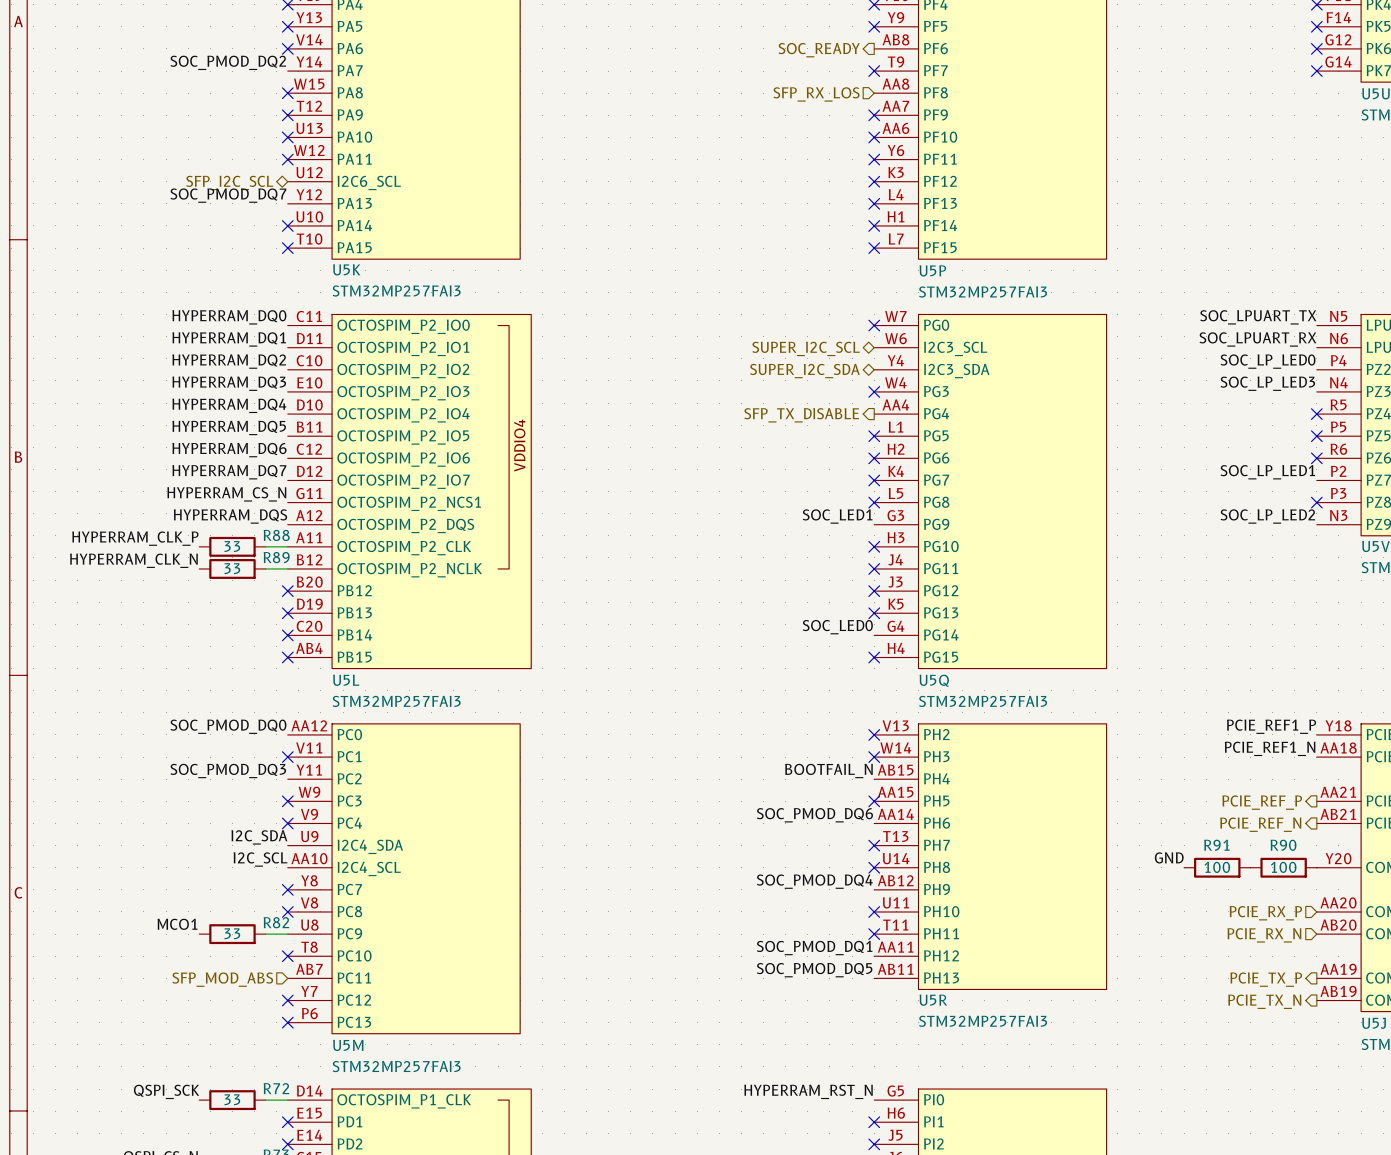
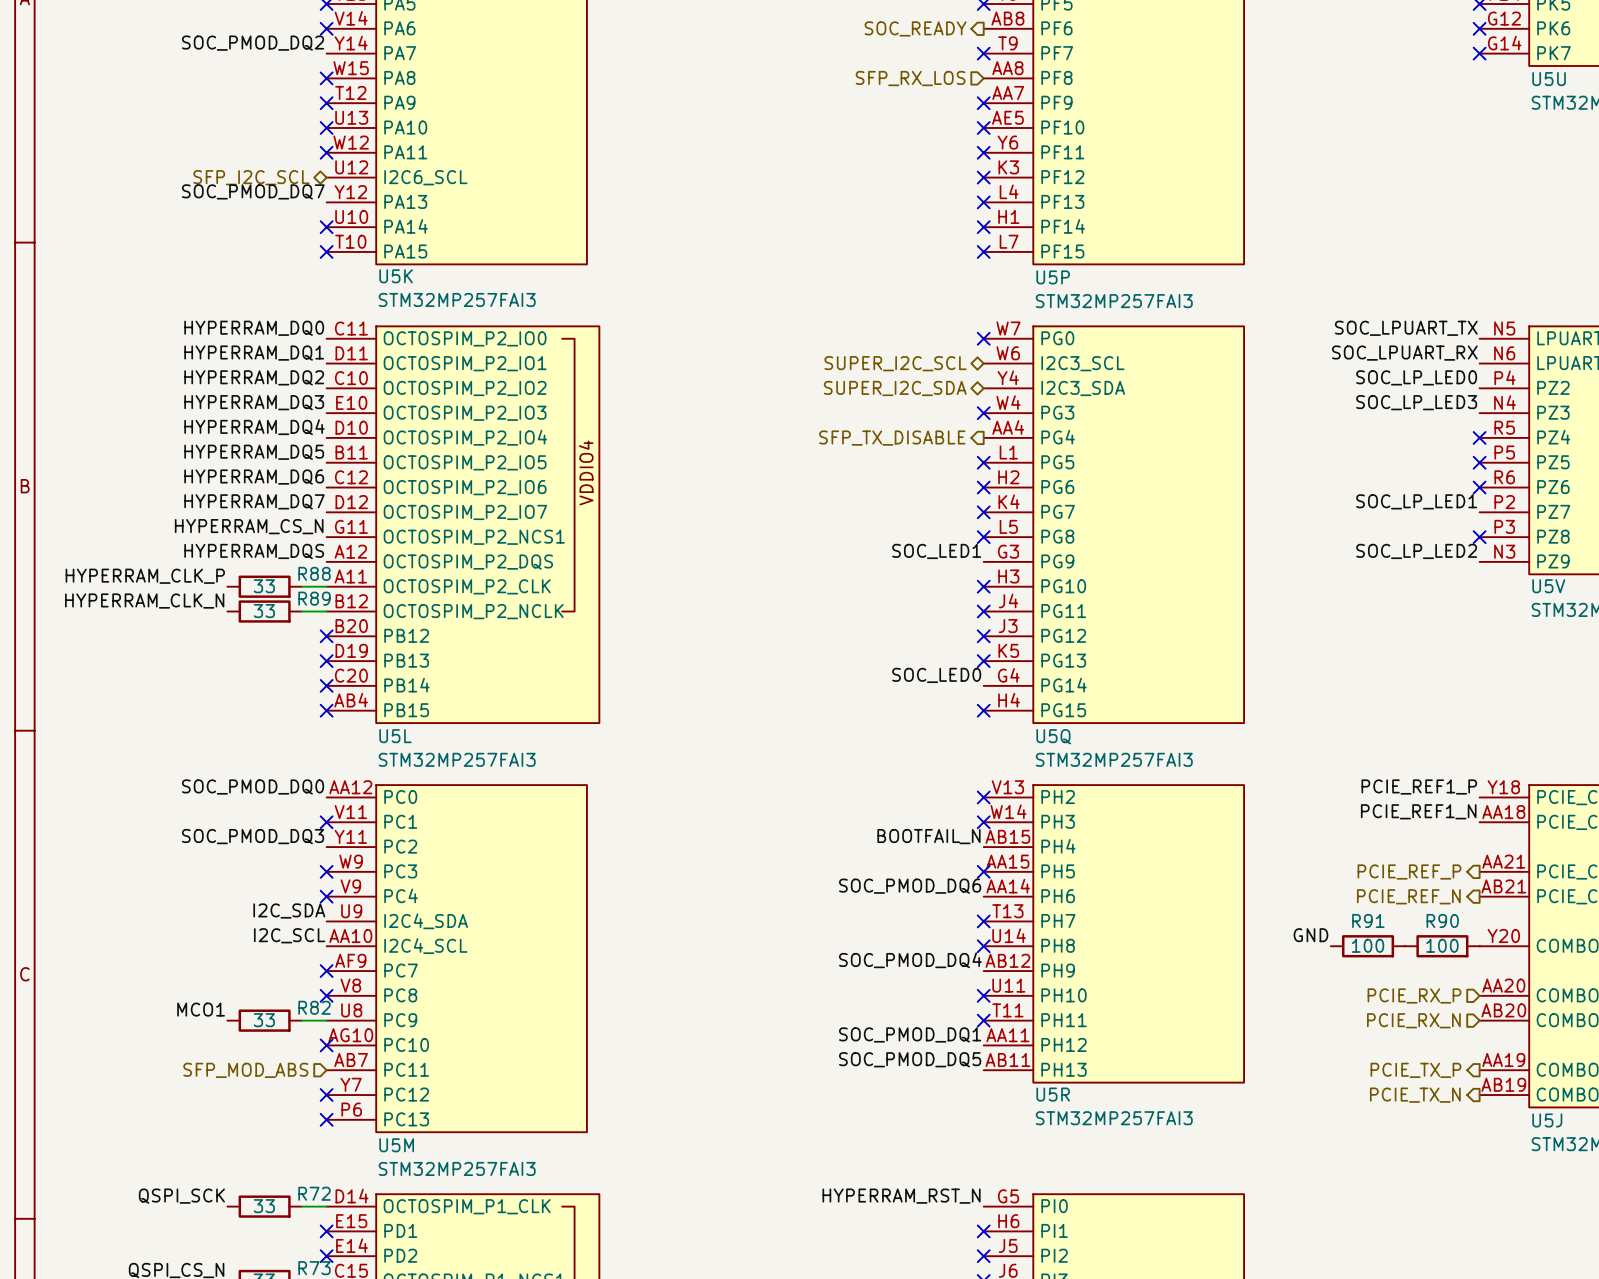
U5P pin number: AA6 (895, 128) -> AE5 (1007, 117)
U5M pin number: Y8 (309, 880) -> AF9 (350, 960)
U5M pin number: T8 (309, 947) -> AG10 (350, 1035)

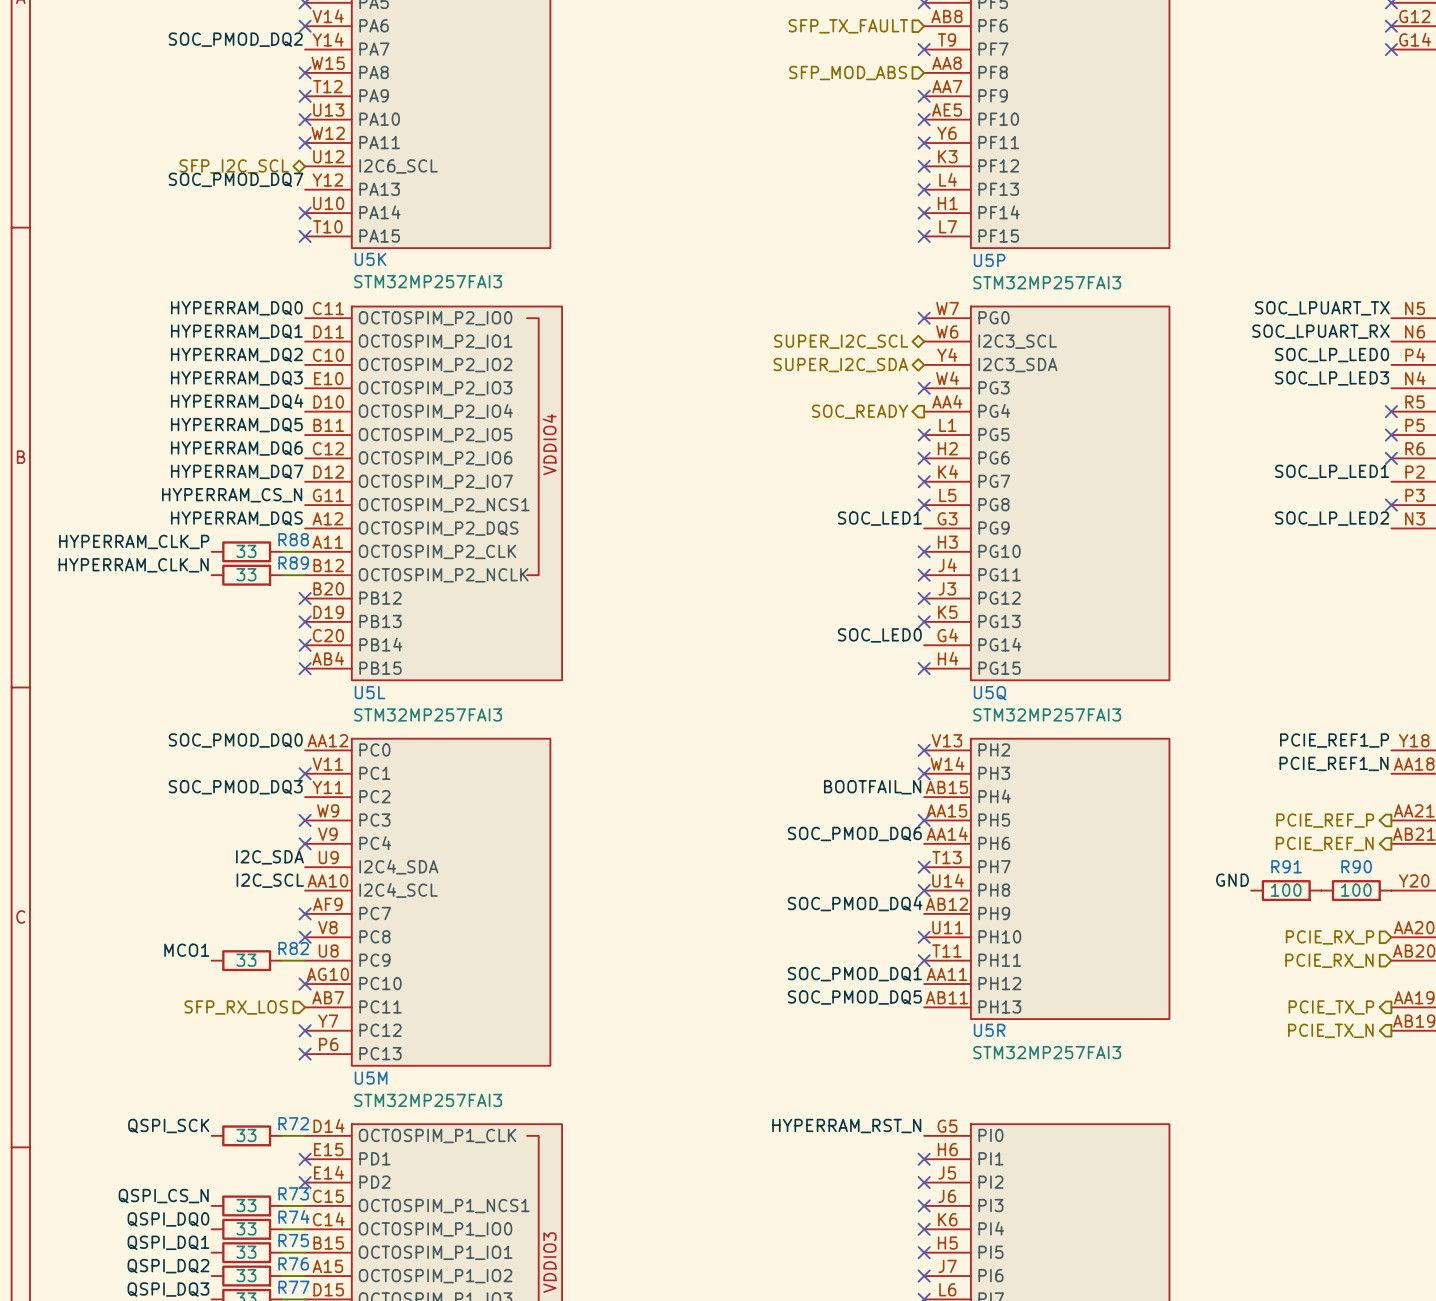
hierarchical label shape: output (915, 28) -> input (848, 26)
hierarchical label: SOC_READY (915, 28) -> SFP_TX_FAULT (848, 26)
hierarchical label: SFP_RX_LOS (910, 78) -> SFP_MOD_ABS (848, 73)
hierarchical label: SFP_TX_DISABLE (892, 438) -> SOC_READY (860, 411)
hierarchical label: SFP_MOD_ABS (245, 1070) -> SFP_RX_LOS (236, 1007)

